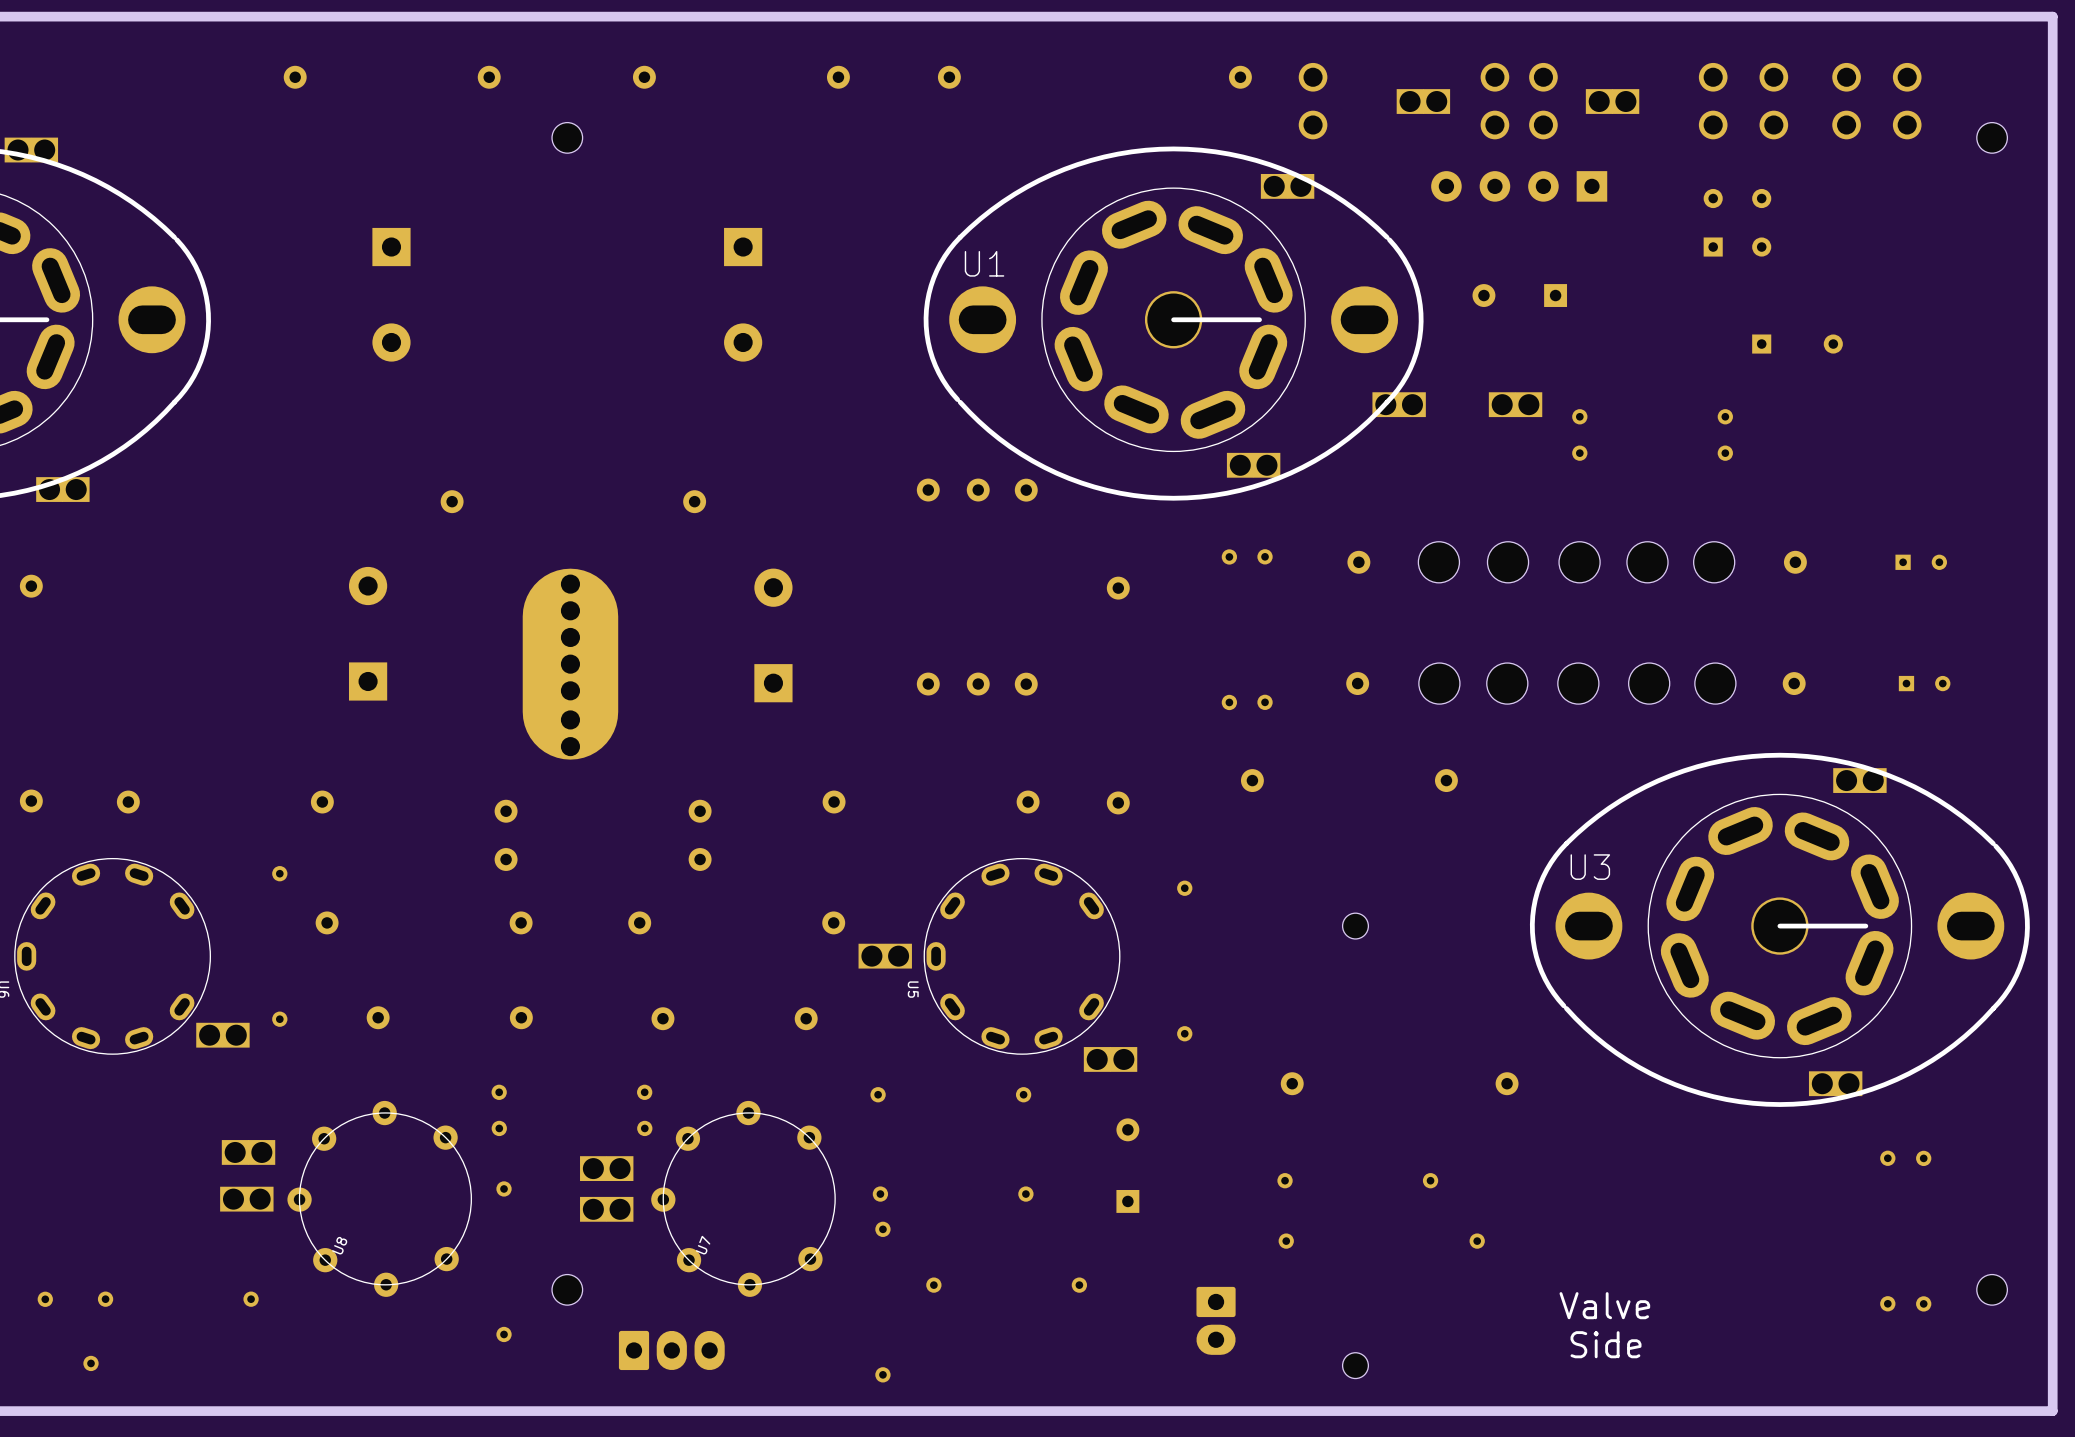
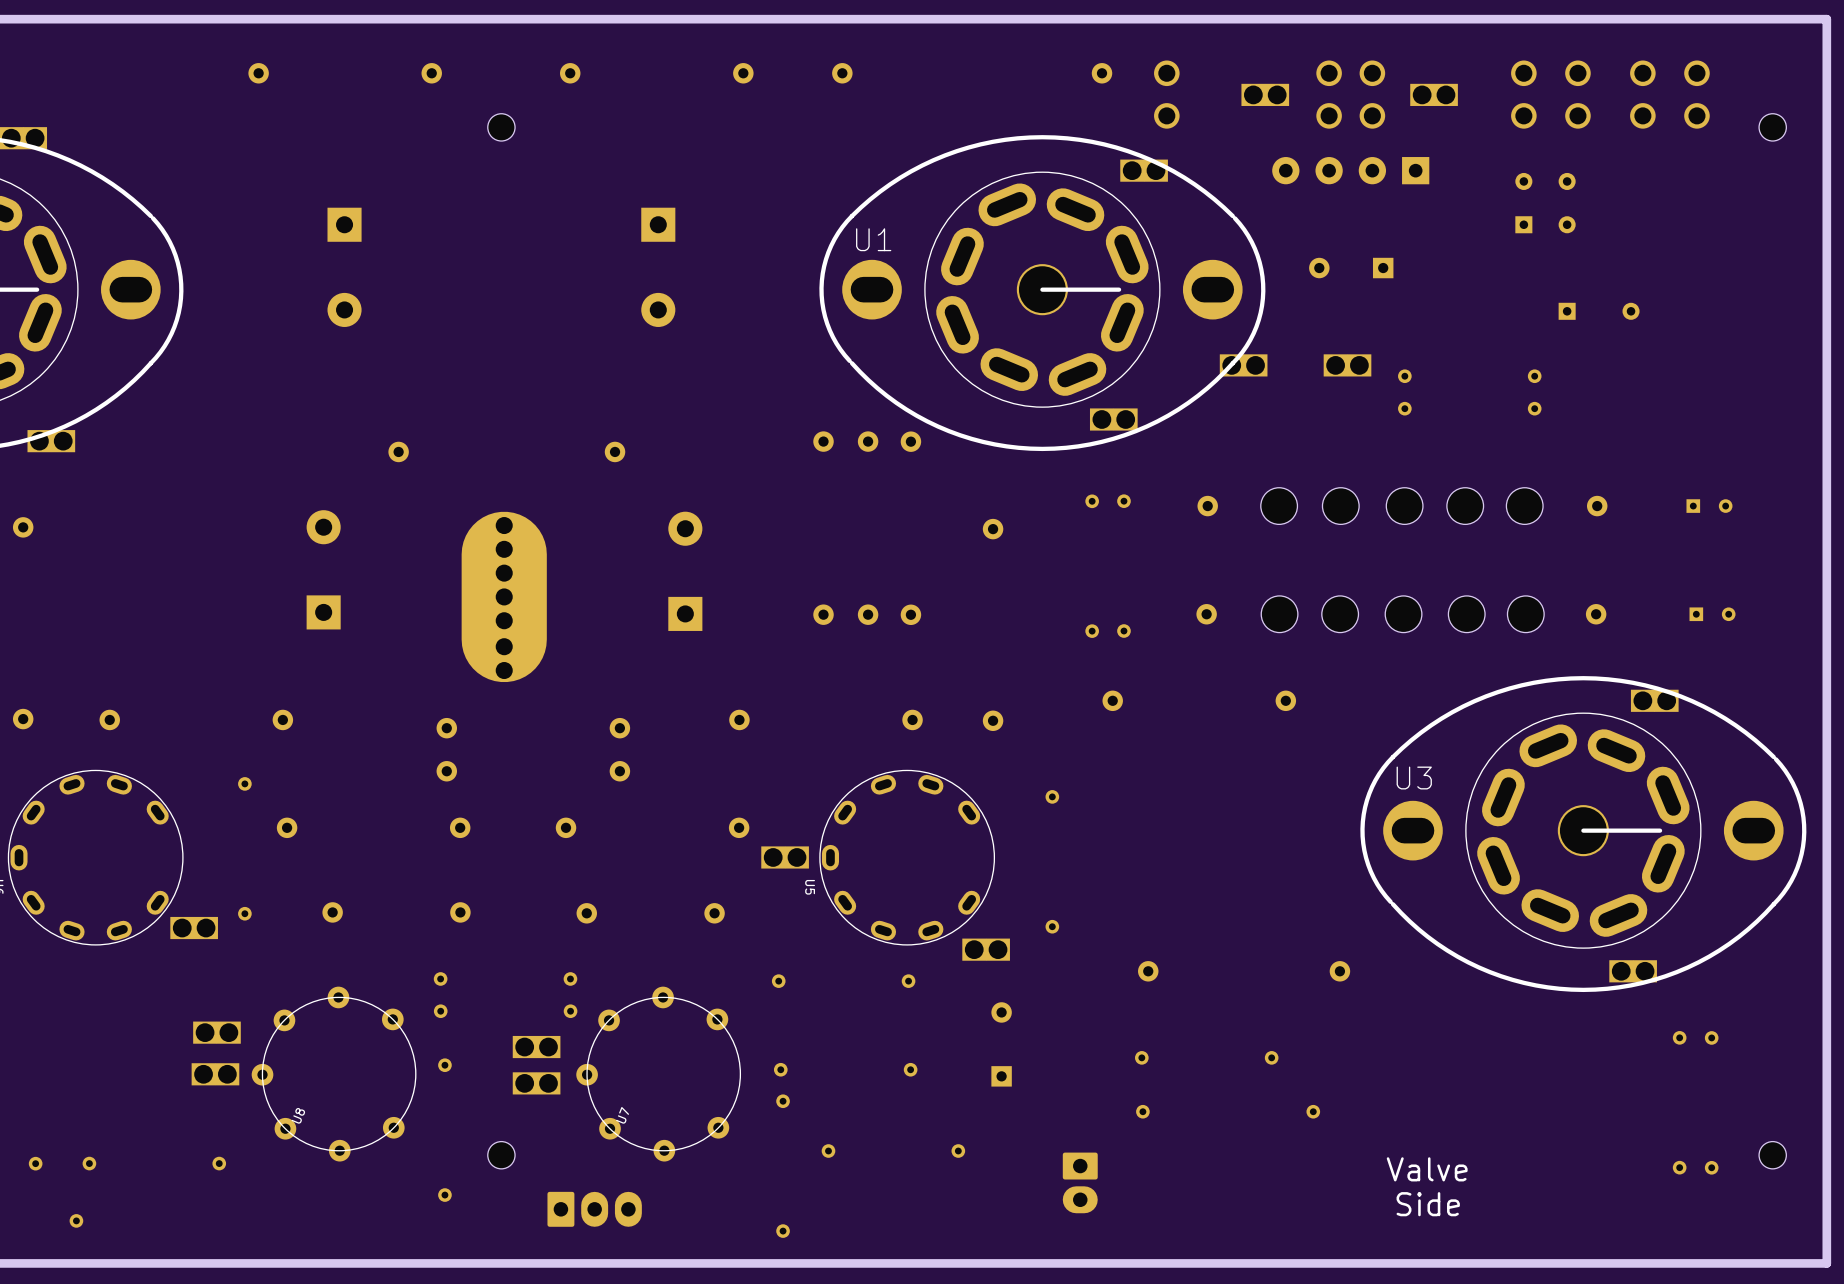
part: (1355, 926) -> none
part: (1355, 1365) -> none

